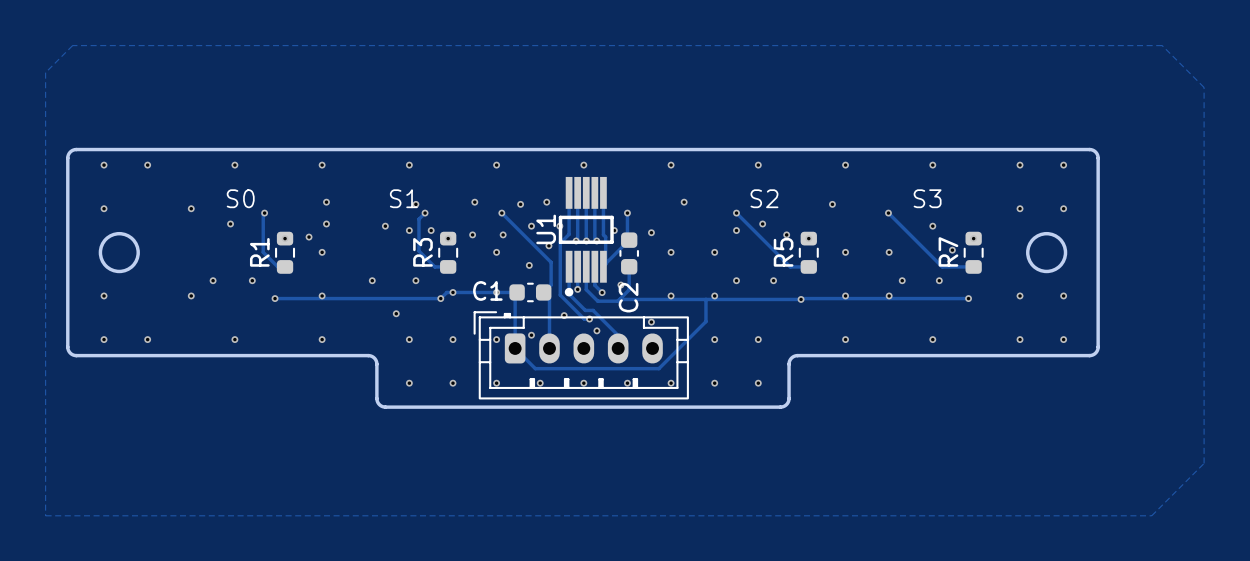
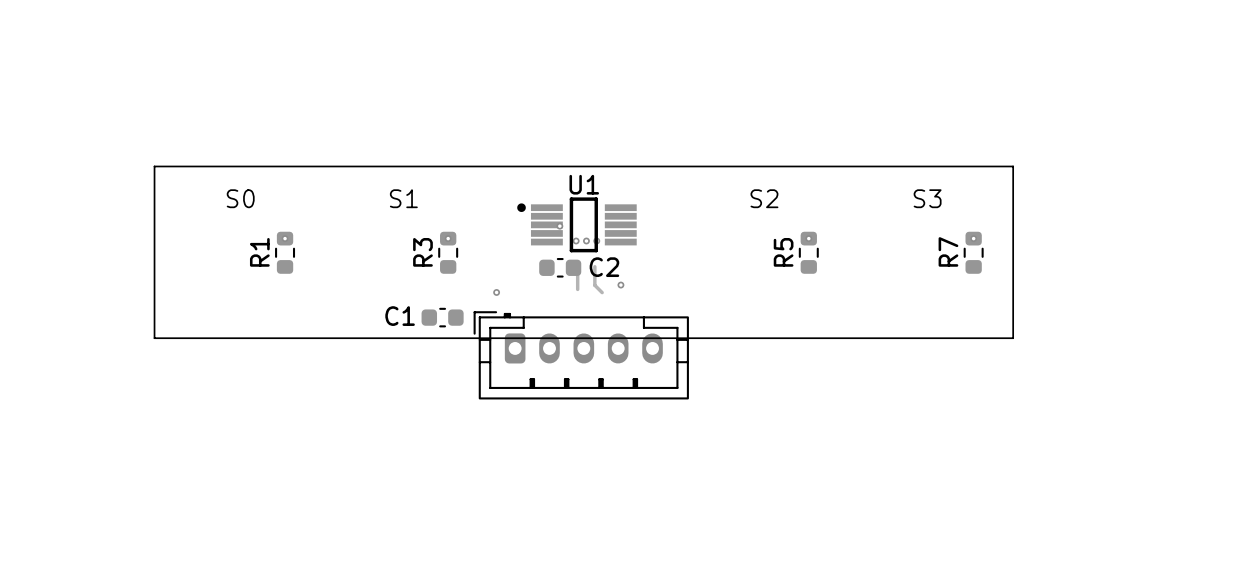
zone outline: (72, 45) (1162, 45) (1204, 87) (1204, 463) (1151, 515) (45, 515) (45, 72) (72, 45) -> none
board edge: (76, 149) (1090, 149) (1096, 152) (1098, 158) (1098, 348) (1095, 353) (1089, 355) (796, 355) (791, 358) (789, 363) (788, 400) (785, 405) (780, 407) (384, 407) (379, 404) (376, 399) (376, 361) (369, 355) (75, 355) (70, 353) (67, 347) (67, 158) (70, 152) (76, 149) -> none
via: (104, 165) -> none
via: (147, 165) -> none
via: (234, 165) -> none
via: (322, 165) -> none
via: (409, 165) -> none
via: (496, 165) -> none
via: (583, 165) -> none
via: (671, 165) -> none
via: (758, 165) -> none
via: (845, 165) -> none
via: (932, 165) -> none
via: (1020, 165) -> none
via: (1063, 165) -> none
line: none -> (154, 166) (1013, 166) (1013, 338) (154, 338) (154, 166)
track: (569, 192) (569, 234) (560, 243) (560, 295) (584, 319) (589, 319) -> none
track: (577, 192) (576, 241) -> none
track: (586, 192) (586, 240) -> none
track: (594, 192) (594, 239) (596, 241) -> none
track: (603, 192) (603, 234) (605, 237) (605, 264) (603, 266) (603, 265) (629, 240) (627, 238) (627, 213) -> none
via: (326, 202) -> none
via: (474, 202) -> none
via: (546, 202) -> none
via: (684, 202) -> none
via: (415, 204) -> none
via: (520, 204) -> none
via: (832, 204) -> none
via: (104, 208) -> none
via: (191, 208) -> none
via: (1020, 208) -> none
via: (1063, 208) -> none
track: (264, 213) (263, 252) (277, 266) (285, 266) -> none
via: (264, 213) -> none
track: (425, 213) (418, 219) (418, 251) (434, 266) (448, 266) -> none
via: (425, 213) -> none
track: (501, 213) (551, 262) (551, 285) (543, 292) (549, 298) (549, 348) -> none
via: (501, 213) -> none
via: (627, 213) -> none
track: (736, 213) (790, 266) (808, 266) -> none
via: (736, 213) -> none
track: (888, 213) (942, 266) (973, 266) -> none
via: (888, 213) -> none
via: (230, 223) -> none
via: (326, 223) -> none
via: (762, 223) -> none
via: (385, 226) -> none
via: (531, 226) -> none
via: (932, 226) -> none
via: (409, 230) -> none
via: (431, 230) -> none
via: (614, 230) -> none
via: (736, 230) -> none
round board edge: [98, 231, 140, 274] -> none
round board edge: [1026, 231, 1068, 274] -> none
via: (651, 232) -> none
via: (472, 234) -> none
via: (503, 234) -> none
via: (786, 234) -> none
U1 rotation: 0° (586, 236) -> 90° clockwise (576, 224)
via: (309, 237) -> none
via: (548, 245) -> none
via: (952, 250) -> none
via: (322, 252) -> none
via: (496, 252) -> none
via: (671, 252) -> none
via: (714, 252) -> none
via: (845, 252) -> none
via: (889, 252) -> none
C2 rotation: 0° (629, 253) -> 90° clockwise (560, 267)
C2 position: (629, 253) -> (560, 267)
via: (529, 265) -> none
track: (569, 266) (569, 294) (585, 310) (593, 310) (618, 335) (618, 348) -> none
track: (586, 266) (586, 289) (597, 301) (617, 301) (629, 289) (629, 266) -> none
via: (213, 280) -> none
via: (252, 280) -> none
via: (372, 280) -> none
via: (415, 280) -> none
via: (736, 280) -> none
via: (773, 280) -> none
via: (902, 280) -> none
via: (939, 280) -> none
via: (577, 289) -> none
via: (452, 292) -> none
C1 position: (530, 292) -> (442, 317)
via: (602, 292) -> none
via: (104, 295) -> none
via: (191, 295) -> none
via: (322, 295) -> none
via: (671, 295) -> none
via: (714, 295) -> none
via: (845, 295) -> none
via: (889, 295) -> none
via: (1020, 295) -> none
via: (1063, 295) -> none
C2 name position: C2 (628, 297) -> C2 (604, 267)
track: (275, 298) (440, 298) (446, 292) (517, 292) (515, 294) (515, 348) (535, 368) (658, 368) (705, 321) (705, 299) -> none
via: (275, 298) -> none
via: (440, 298) -> none
track: (968, 298) (619, 299) -> none
via: (968, 298) -> none
via: (801, 299) -> none
via: (396, 313) -> none
via: (564, 315) -> none
via: (589, 319) -> none
via: (651, 322) -> none
via: (596, 330) -> none
via: (531, 335) -> none
via: (104, 339) -> none
via: (147, 339) -> none
via: (234, 339) -> none
via: (322, 339) -> none
via: (409, 339) -> none
via: (452, 339) -> none
via: (496, 339) -> none
via: (714, 339) -> none
via: (758, 339) -> none
via: (845, 339) -> none
via: (932, 339) -> none
via: (1020, 339) -> none
via: (1063, 339) -> none
via: (409, 383) -> none
via: (452, 383) -> none
via: (496, 383) -> none
via: (540, 383) -> none
via: (583, 383) -> none
via: (627, 383) -> none
via: (671, 383) -> none
via: (714, 383) -> none
via: (758, 383) -> none

